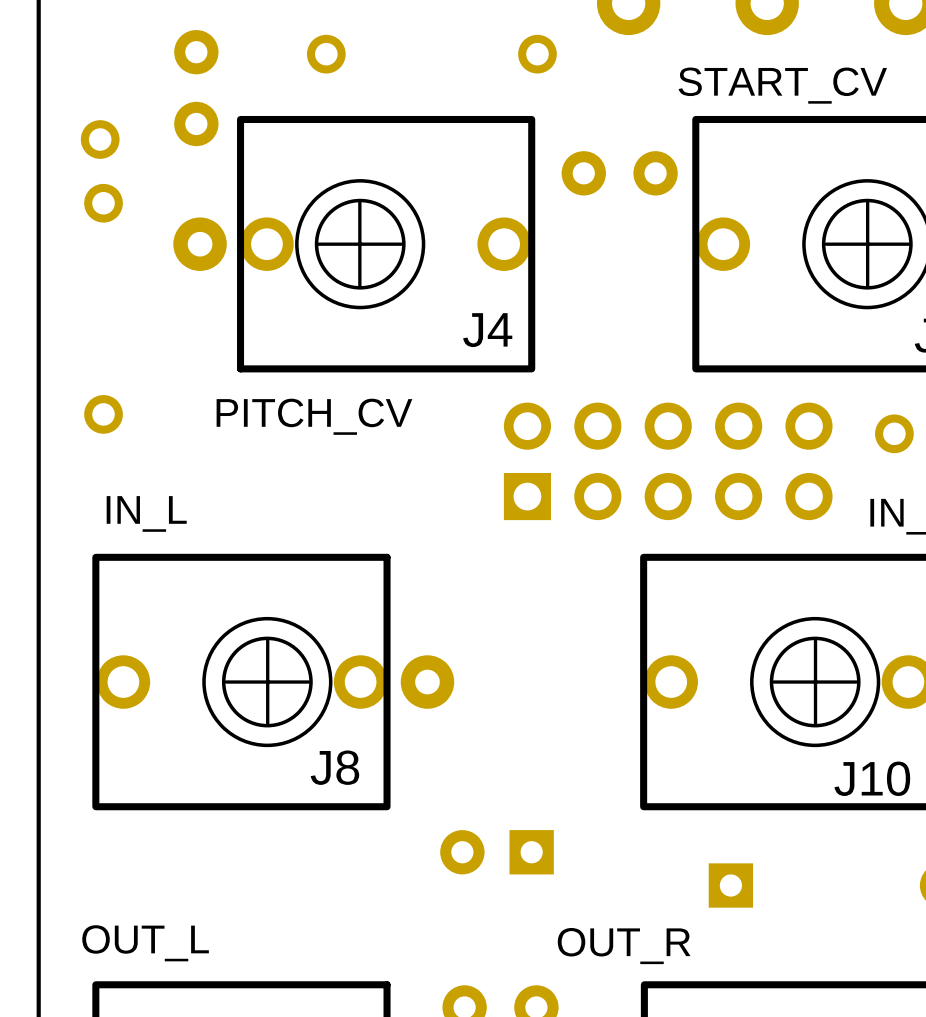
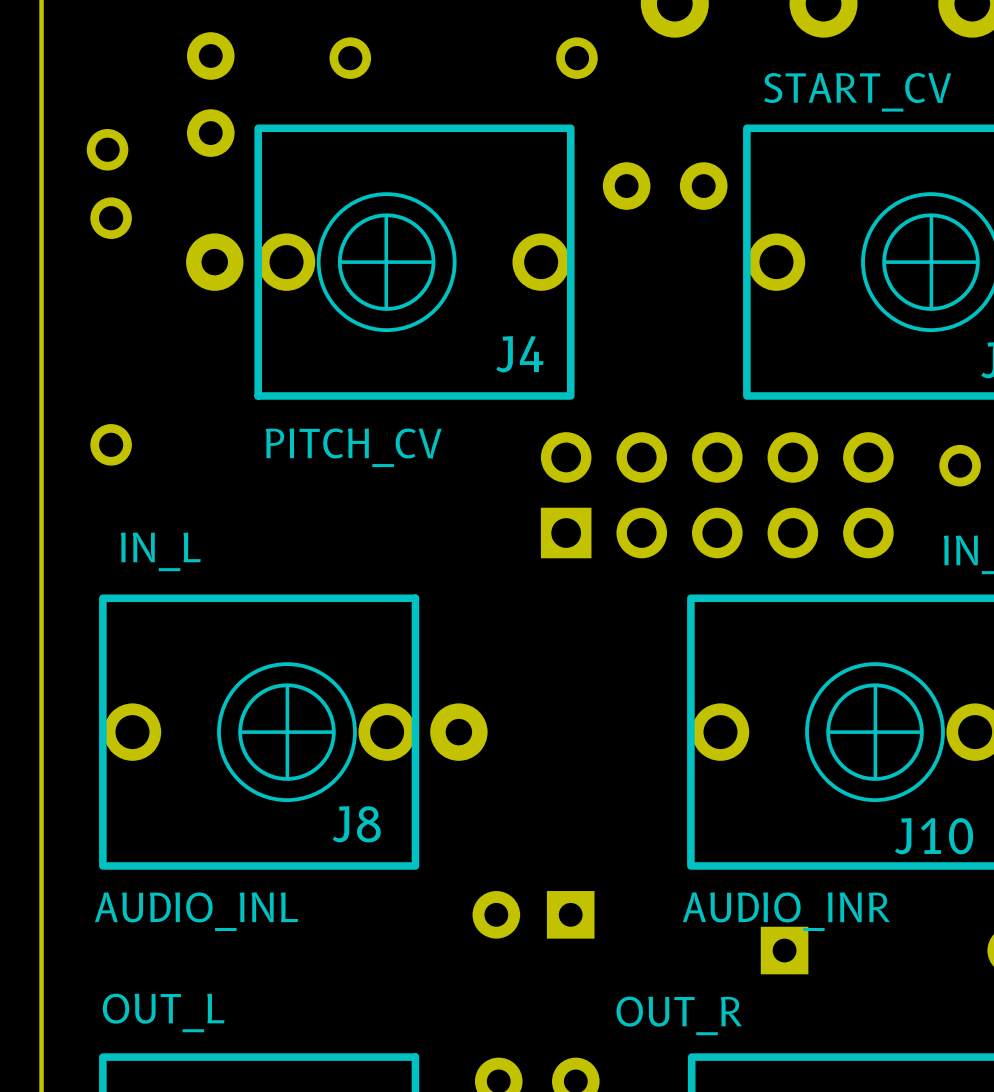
J8 value: none -> AUDIO_INL (196, 911)
J10 value: none -> AUDIO_INR (786, 911)

